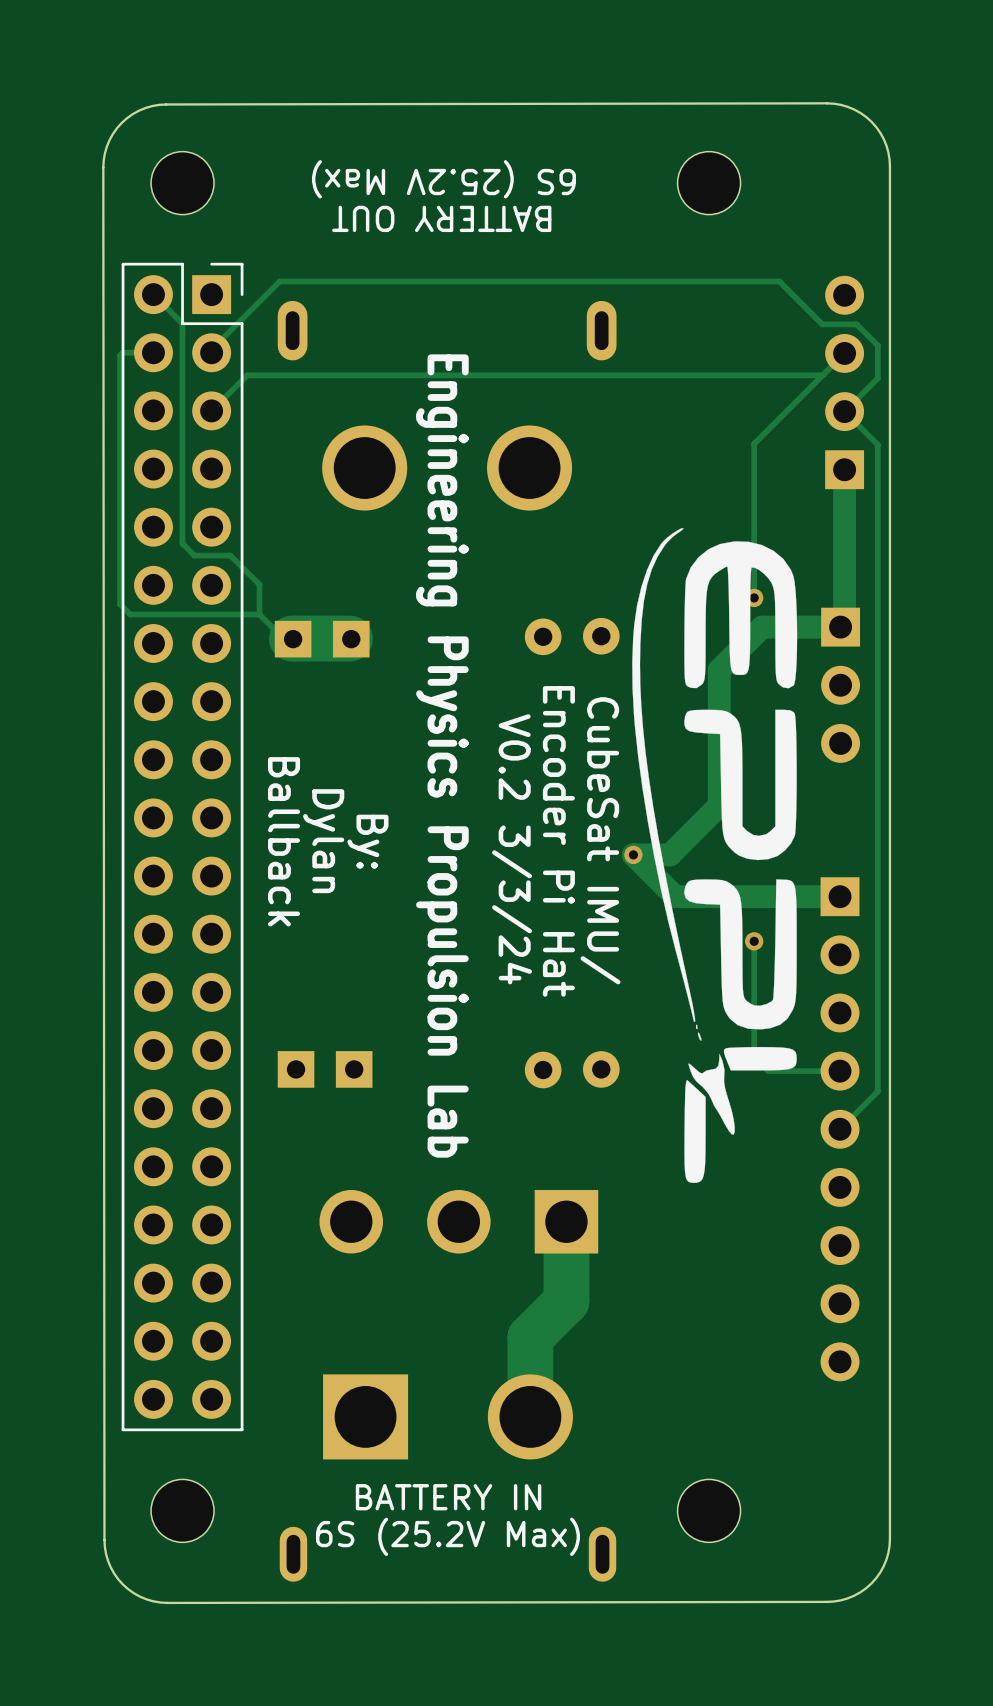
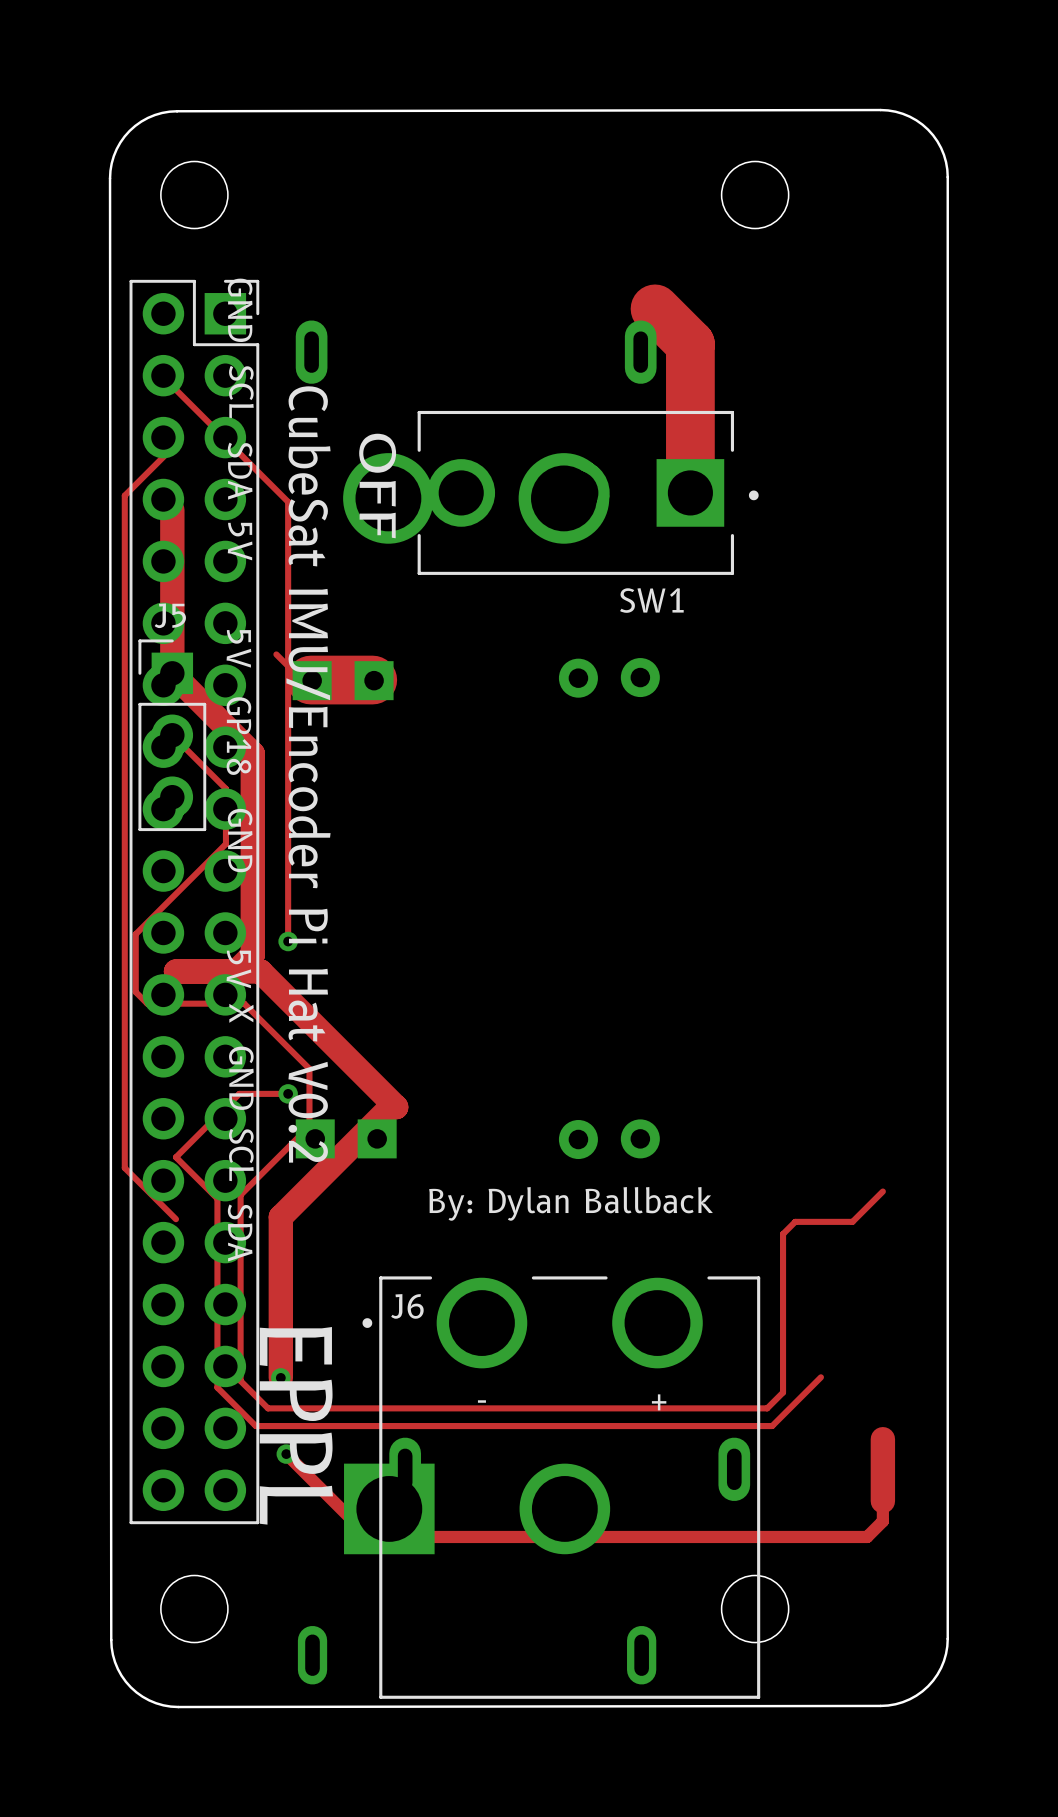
text: 6S (25.2V Max) (443, 179) -> none
text: BATTERY OUT (441, 218) -> none
track: none -> (655, 308) (690, 344) (690, 492)
text: none -> GND (240, 310)
track: (153, 294) (182, 323) (182, 543) (194, 555) (230, 555) (259, 584) (259, 614) (130, 614) (120, 604) (120, 355) (122, 352) (153, 352) -> none
track: (211, 352) (211, 349) (279, 281) (779, 281) (822, 324) (856, 324) (877, 345) (877, 378) (844, 411) (877, 444) (877, 1091) (840, 1129) -> none
track: (844, 353) (754, 443) (754, 597) -> none
track: none -> (172, 386) (288, 501) (288, 941)
text: none -> SCL (241, 391)
track: (822, 375) (247, 375) (211, 410) -> none
part: (844, 382) -> none
track: none -> (172, 448) (124, 495) (124, 1167) (175, 1219)
text: none -> SDA (240, 471)
text: none -> OFF (377, 486)
SW1: none -> (588, 492)
track: (844, 469) (844, 623) (840, 627) (762, 627) (719, 670) (719, 805) (670, 854) (633, 854) (675, 896) (840, 896) -> none
track: none -> (172, 509) (172, 673) (252, 753) (252, 954) (236, 971)
text: none -> 5V (240, 541)
drawing: [632, 528, 798, 1183] -> none
via: (754, 597) -> none
text: none -> 5V (238, 648)
part: (840, 685) -> none
track: none -> (172, 735) (225, 788) (225, 843) (135, 934) (135, 992) (147, 1003) (244, 1003) (309, 1068) (309, 1126) (240, 1195) (240, 1380) (268, 1408) (767, 1408) (783, 1392) (783, 1234) (795, 1221) (852, 1221) (882, 1191)
J5: none -> (172, 735)
text: none -> GP18 (238, 736)
text: none -> CubeSat IMU/Encoder Pi Hat V0.2 (308, 774)
text: Engineering Physics Propulsion Lab (442, 756) -> none
text: none -> GND (240, 840)
text: CubeSat IMU/ (600, 840) -> none
text: Ballback (284, 841) -> none
text: Dylan (323, 841) -> none
text: By: (367, 841) -> none
text: Encoder Pi Hat (558, 841) -> none
text: V0.2 3/3/24 (512, 849) -> none
via: (633, 854) -> none
via: none -> (288, 941)
text: none -> 5V (238, 969)
track: none -> (175, 971) (260, 971) (396, 1107) (390, 1107) (280, 1216) (280, 1377)
track: (754, 941) (754, 1056) (768, 1071) (840, 1071) -> none
via: (754, 941) -> none
text: none -> X (241, 1013)
text: none -> GND (241, 1078)
track: none -> (288, 1093) (239, 1093) (175, 1157) (217, 1198) (217, 1387) (255, 1426) (772, 1426) (820, 1377)
via: none -> (288, 1093)
text: none -> SCL (241, 1155)
part: (840, 1129) -> none
text: none -> By: Dylan Ballback (571, 1203)
text: none -> SDA (240, 1232)
part: (458, 1221) -> none
track: (566, 1221) (566, 1301) (530, 1337) (530, 1416) -> none
via: none -> (280, 1377)
text: none -> EPPL (296, 1425)
track: none -> (882, 1439) (882, 1521) (867, 1536) (369, 1536) (286, 1454)
via: none -> (286, 1454)
J6: none -> (561, 1487)
text: BATTERY IN (448, 1497) -> none
text: 6S (25.2V Max) (448, 1536) -> none

